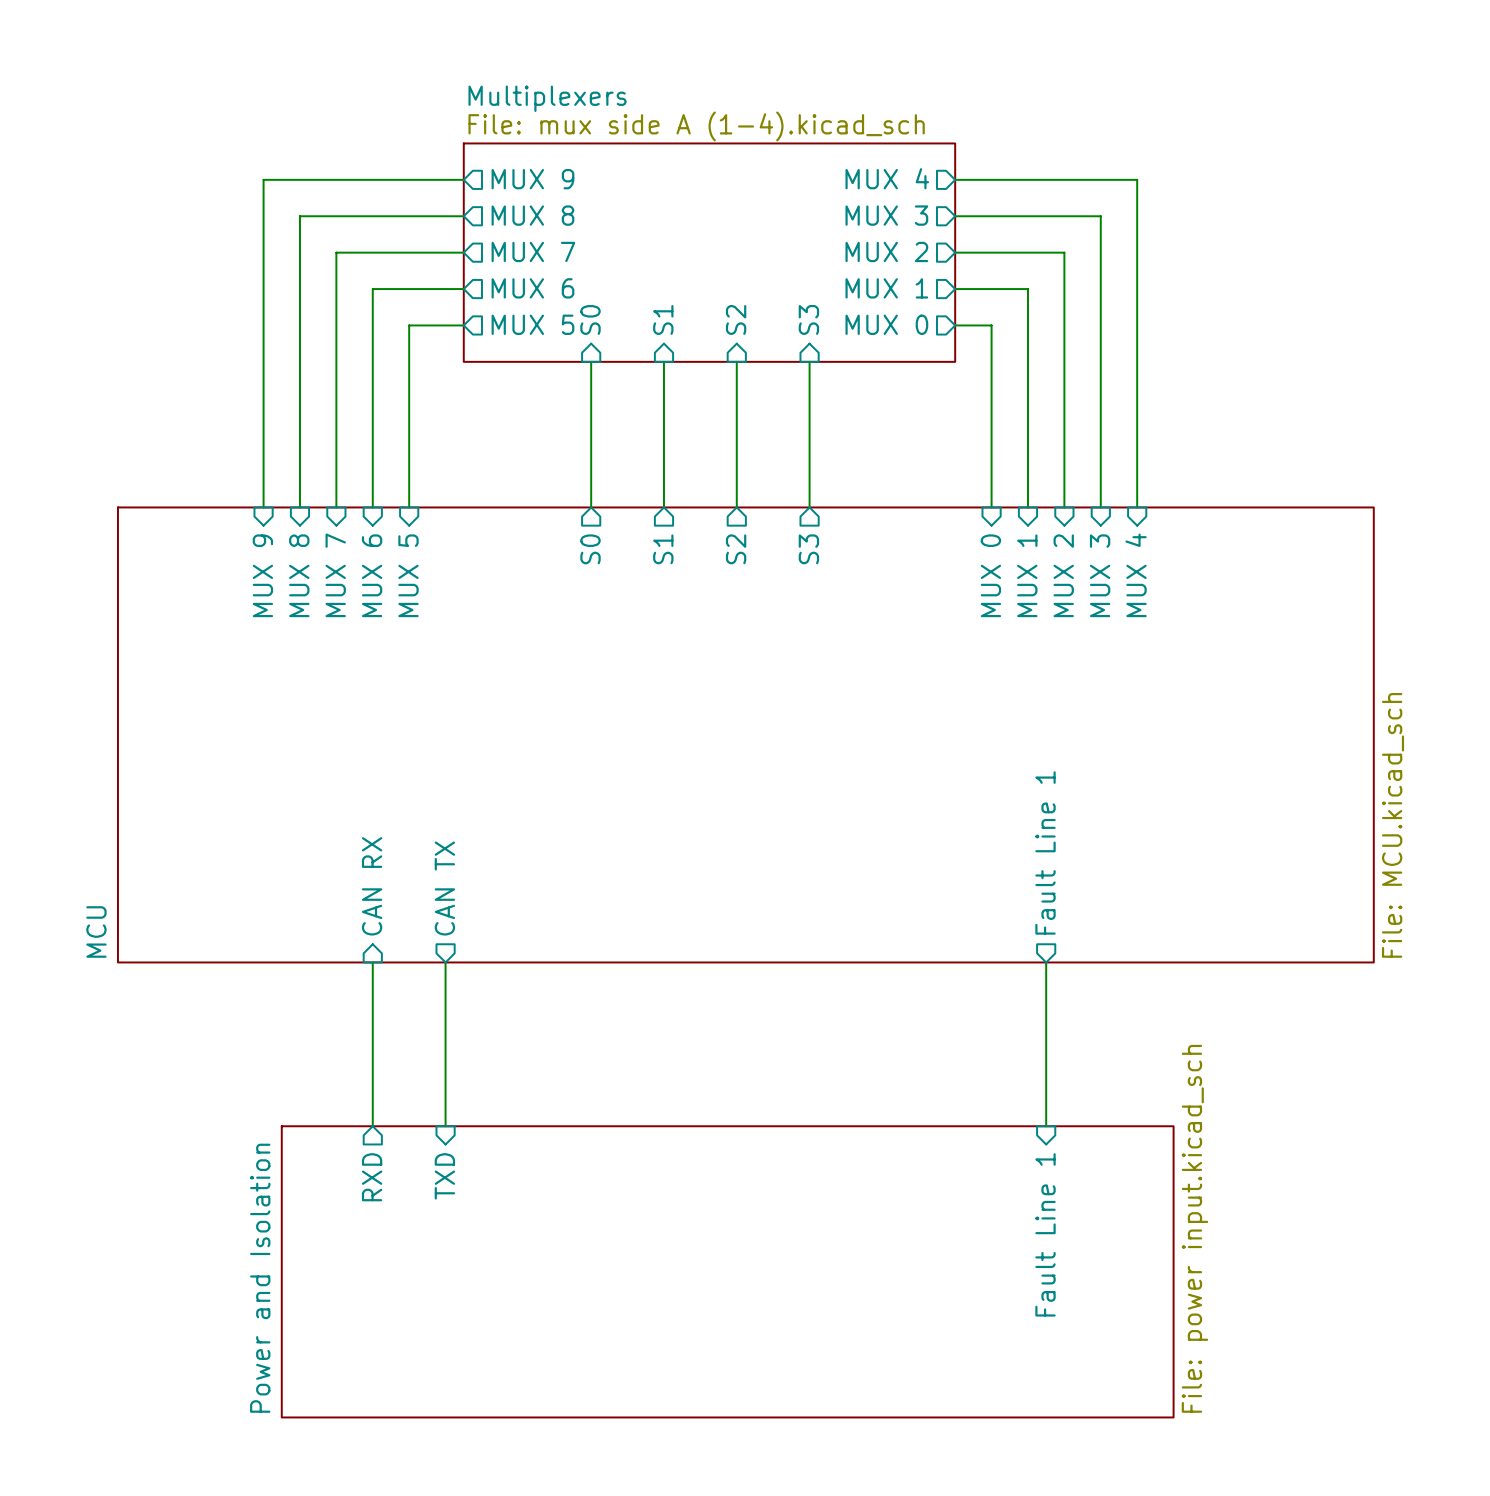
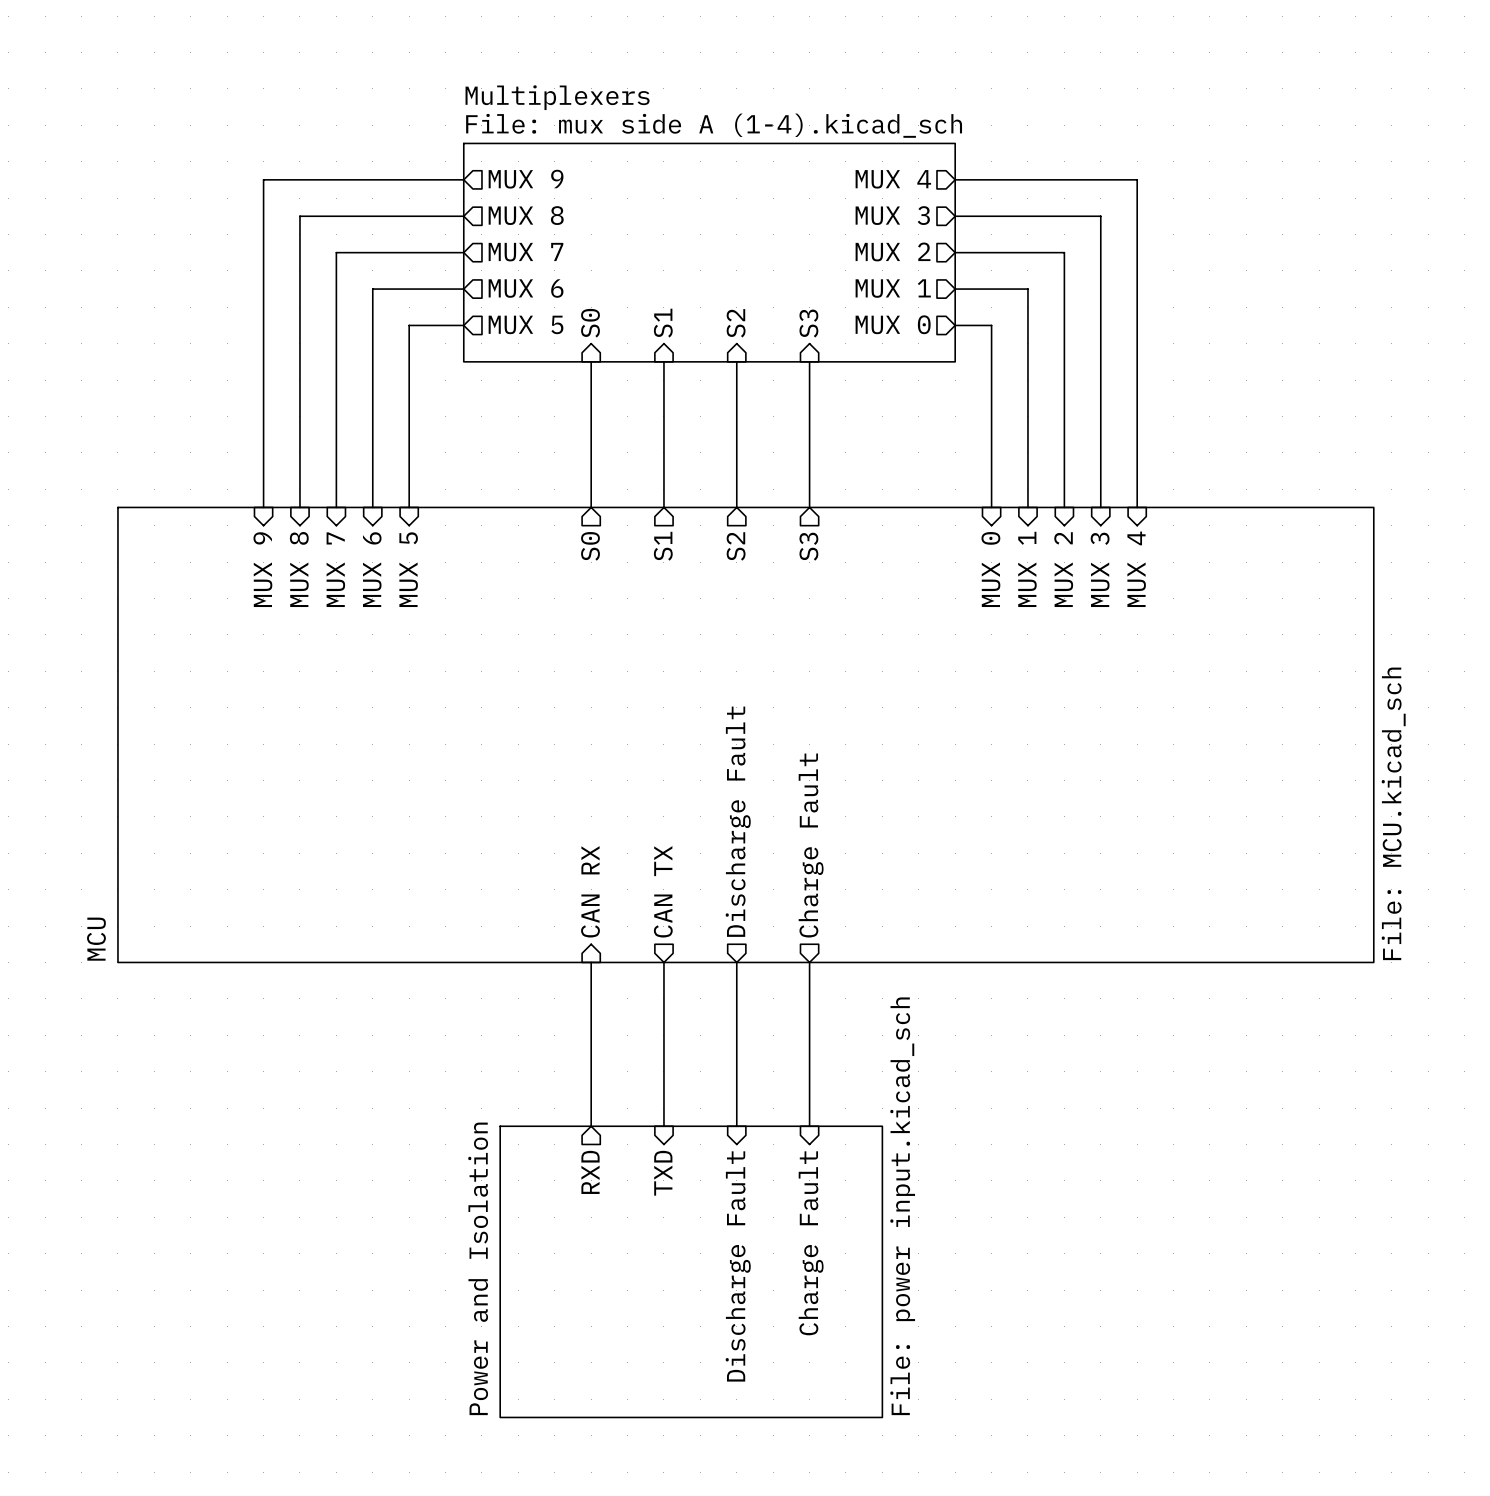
sheet pin: none -> Discharge Fault (738, 821)
sheet pin: none -> Charge Fault (811, 845)
sheet pin: Fault Line 1 (1045, 852) -> none
sheet pin position: CAN RX (372, 886) -> CAN RX (590, 891)
sheet pin position: CAN TX (444, 888) -> CAN TX (663, 891)
wire: (372, 962) (372, 1126) -> (591, 962) (591, 1126)
wire: (445, 962) (445, 1126) -> (663, 962) (663, 1126)
wire: none -> (736, 962) (736, 1126)
wire: (1046, 962) (1046, 1126) -> (809, 962) (809, 1126)
sheet pin position: TXD (444, 1176) -> TXD (663, 1173)
sheet pin position: RXD (372, 1177) -> RXD (590, 1172)
sheet pin: Fault Line 1 (1045, 1234) -> none
sheet pin: none -> Charge Fault (811, 1243)
sheet pin: none -> Discharge Fault (738, 1266)
sheet Power and Isolation: none -> File: power input.kicad_sch (691, 1271)
sheet Power and Isolation: File: power input.kicad_sch (727, 1271) -> none

